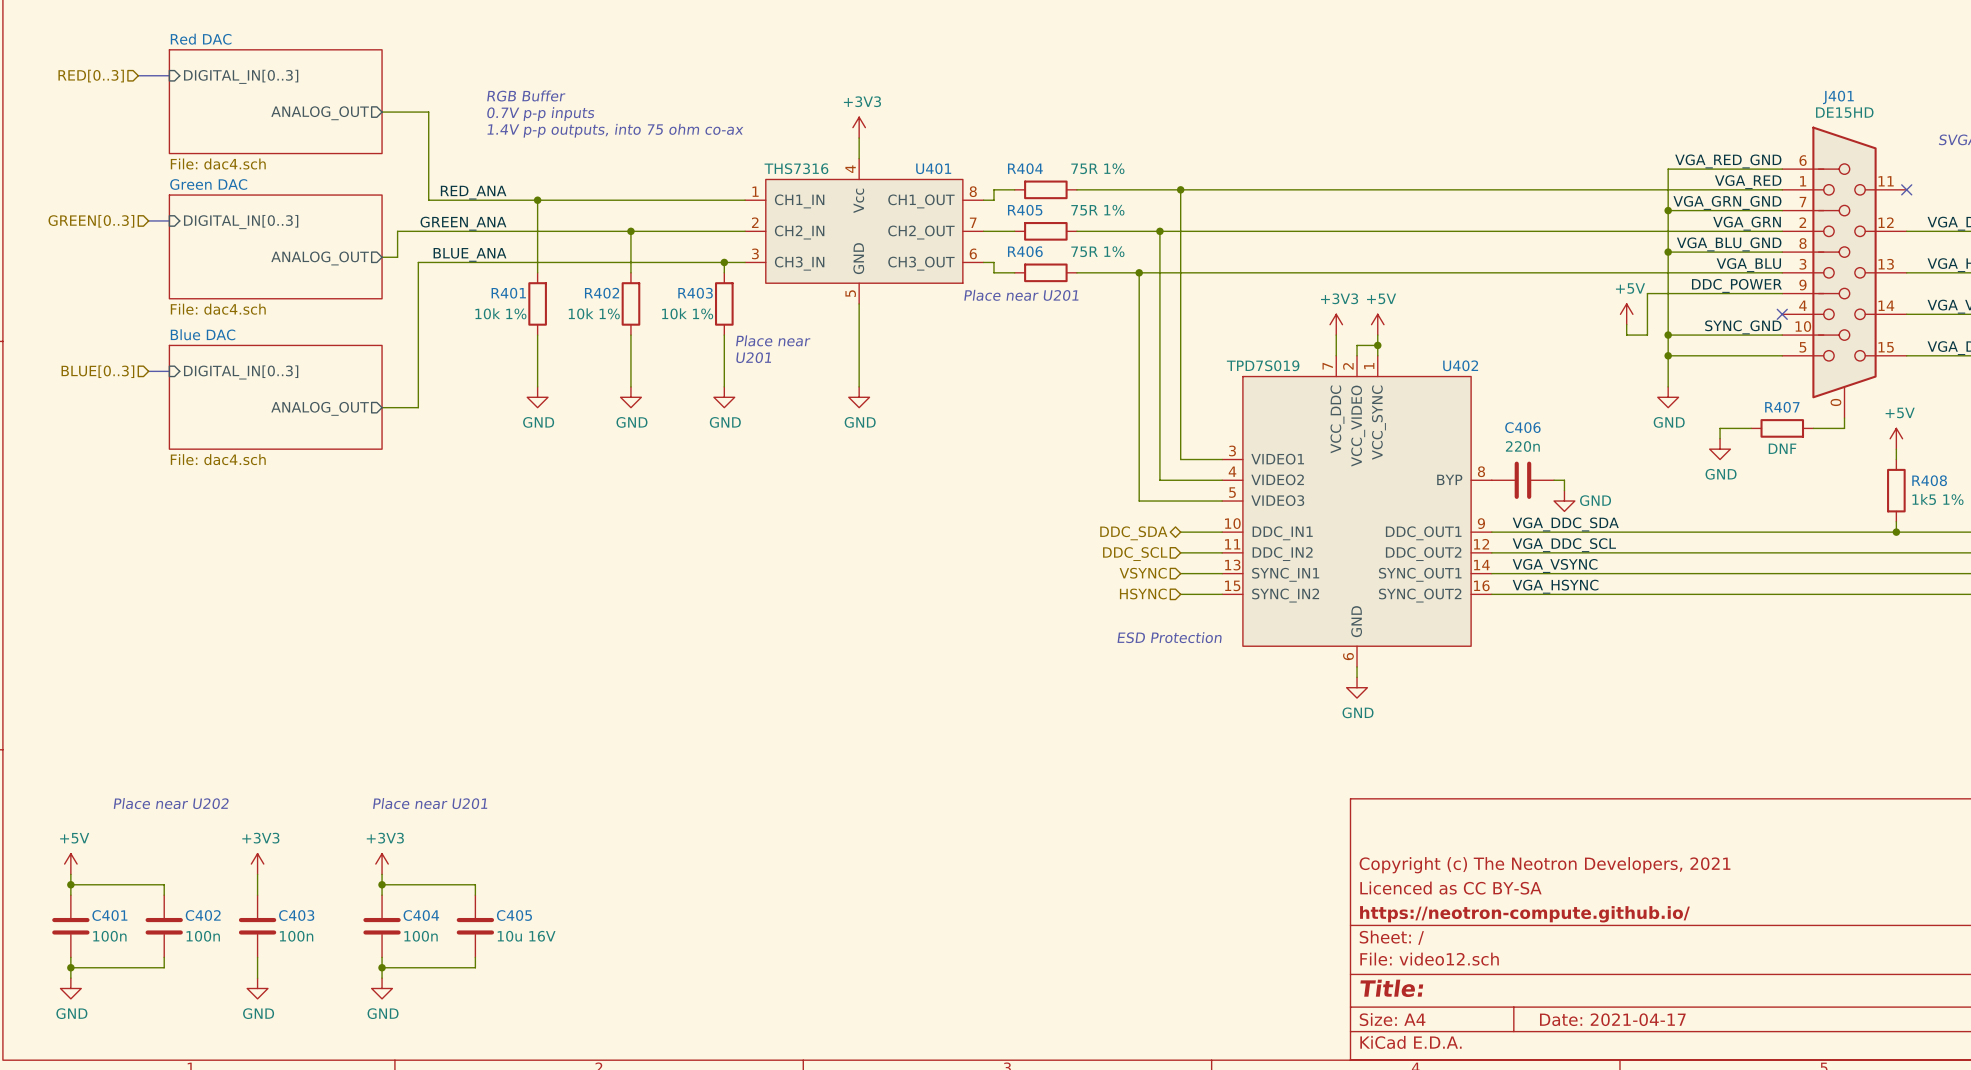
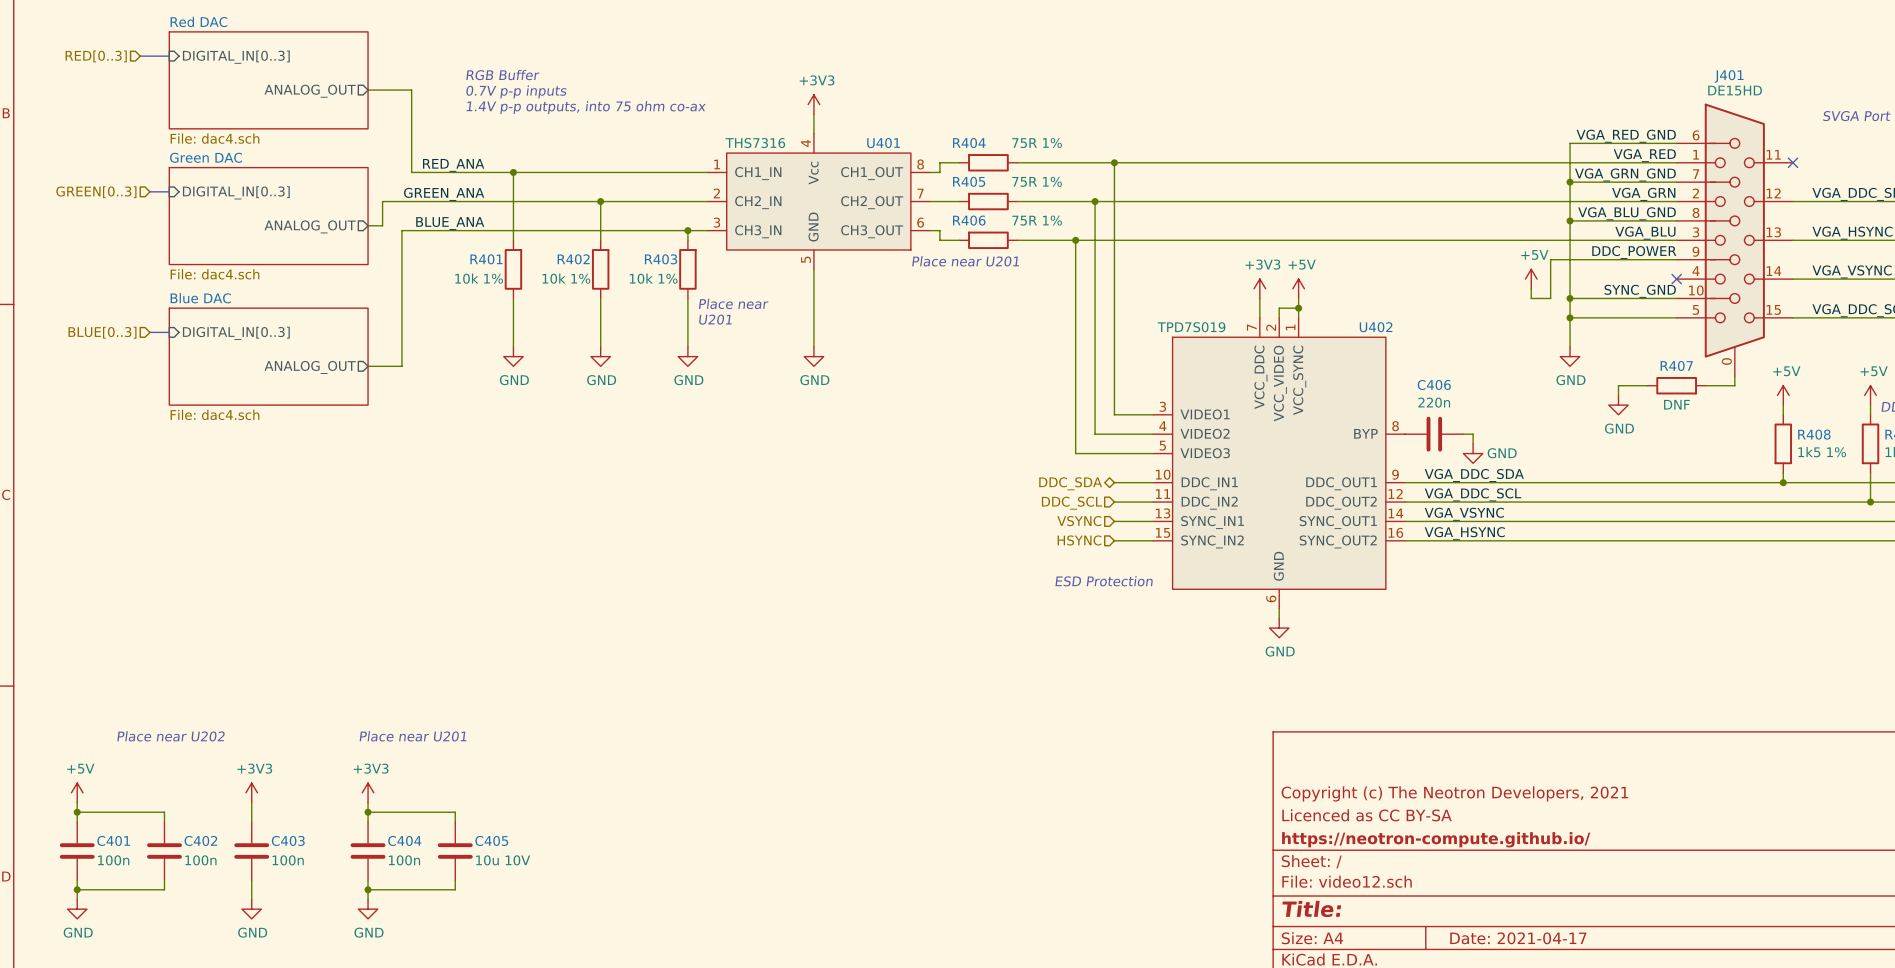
C405 value: 10u 16V (526, 936) -> 10u 10V (503, 860)

